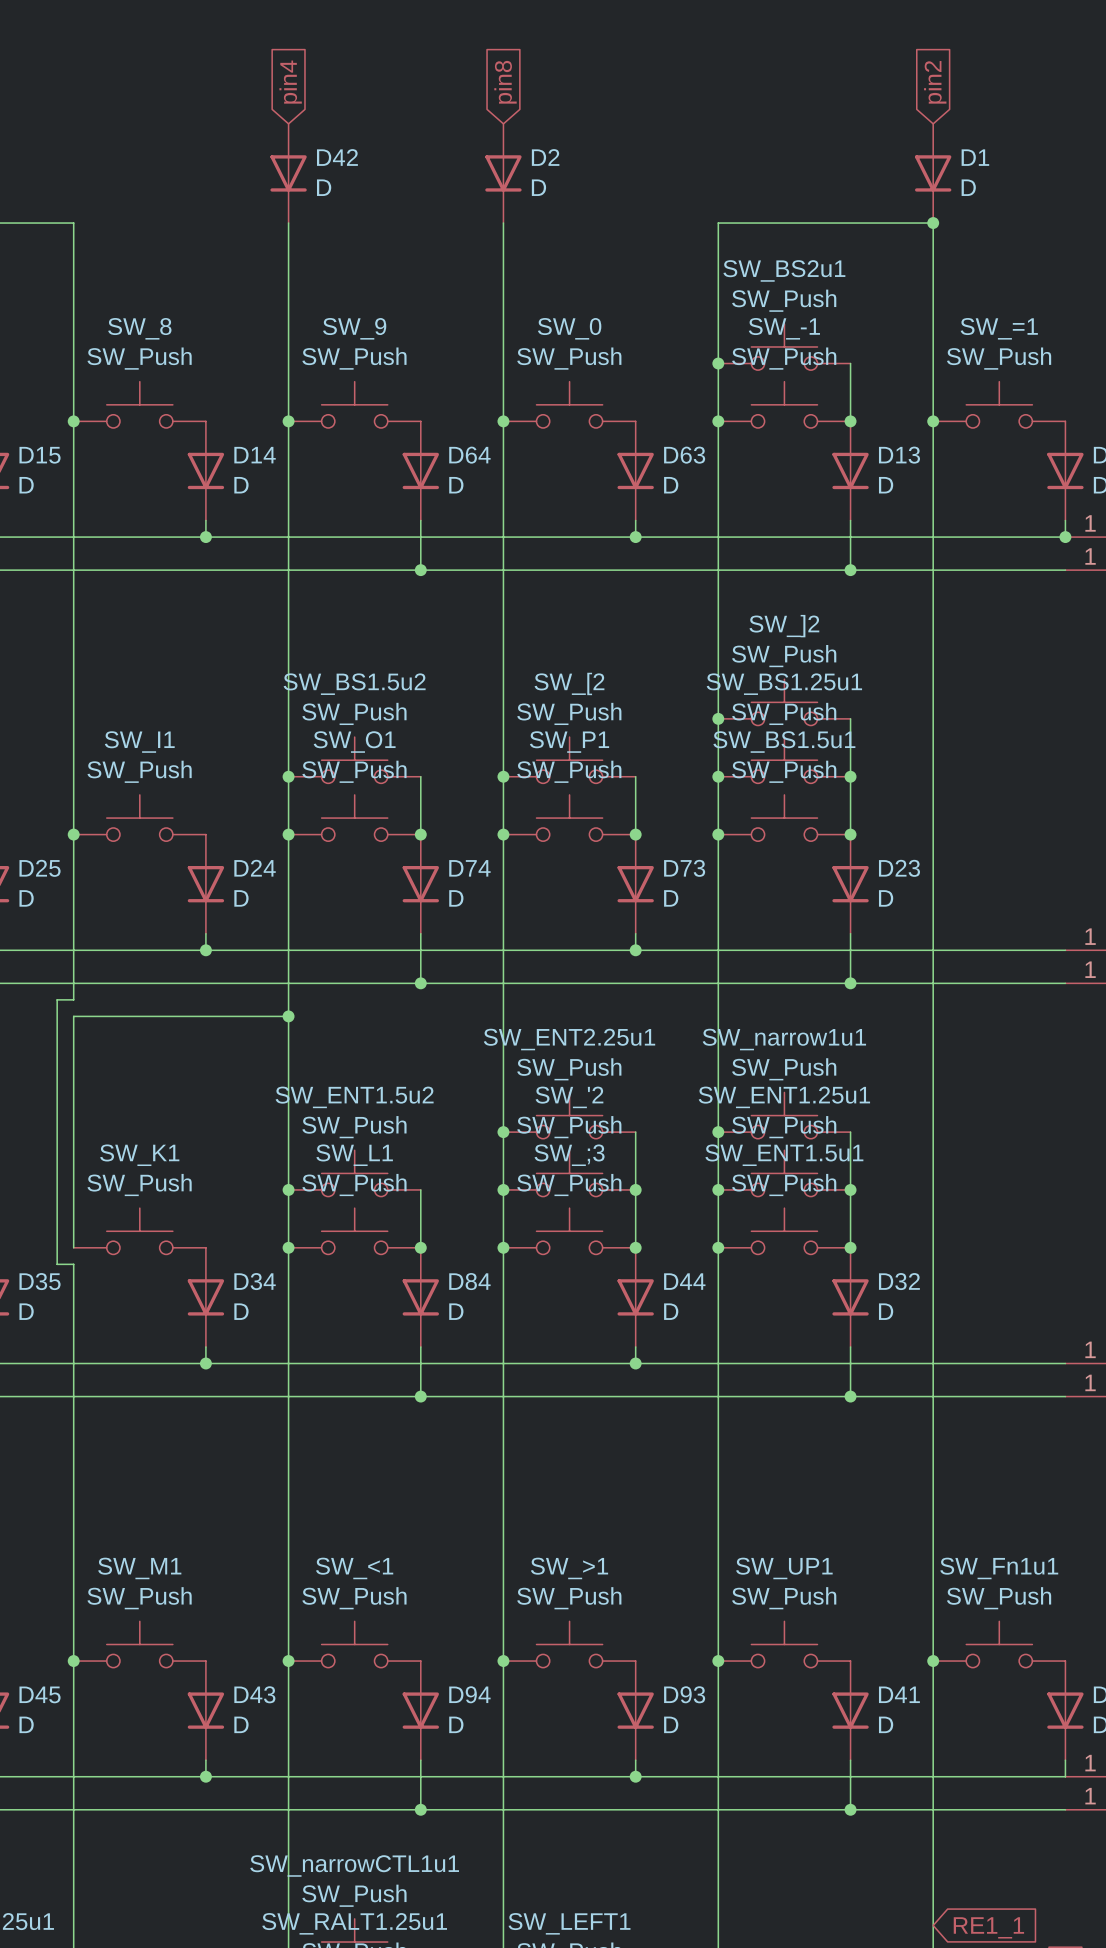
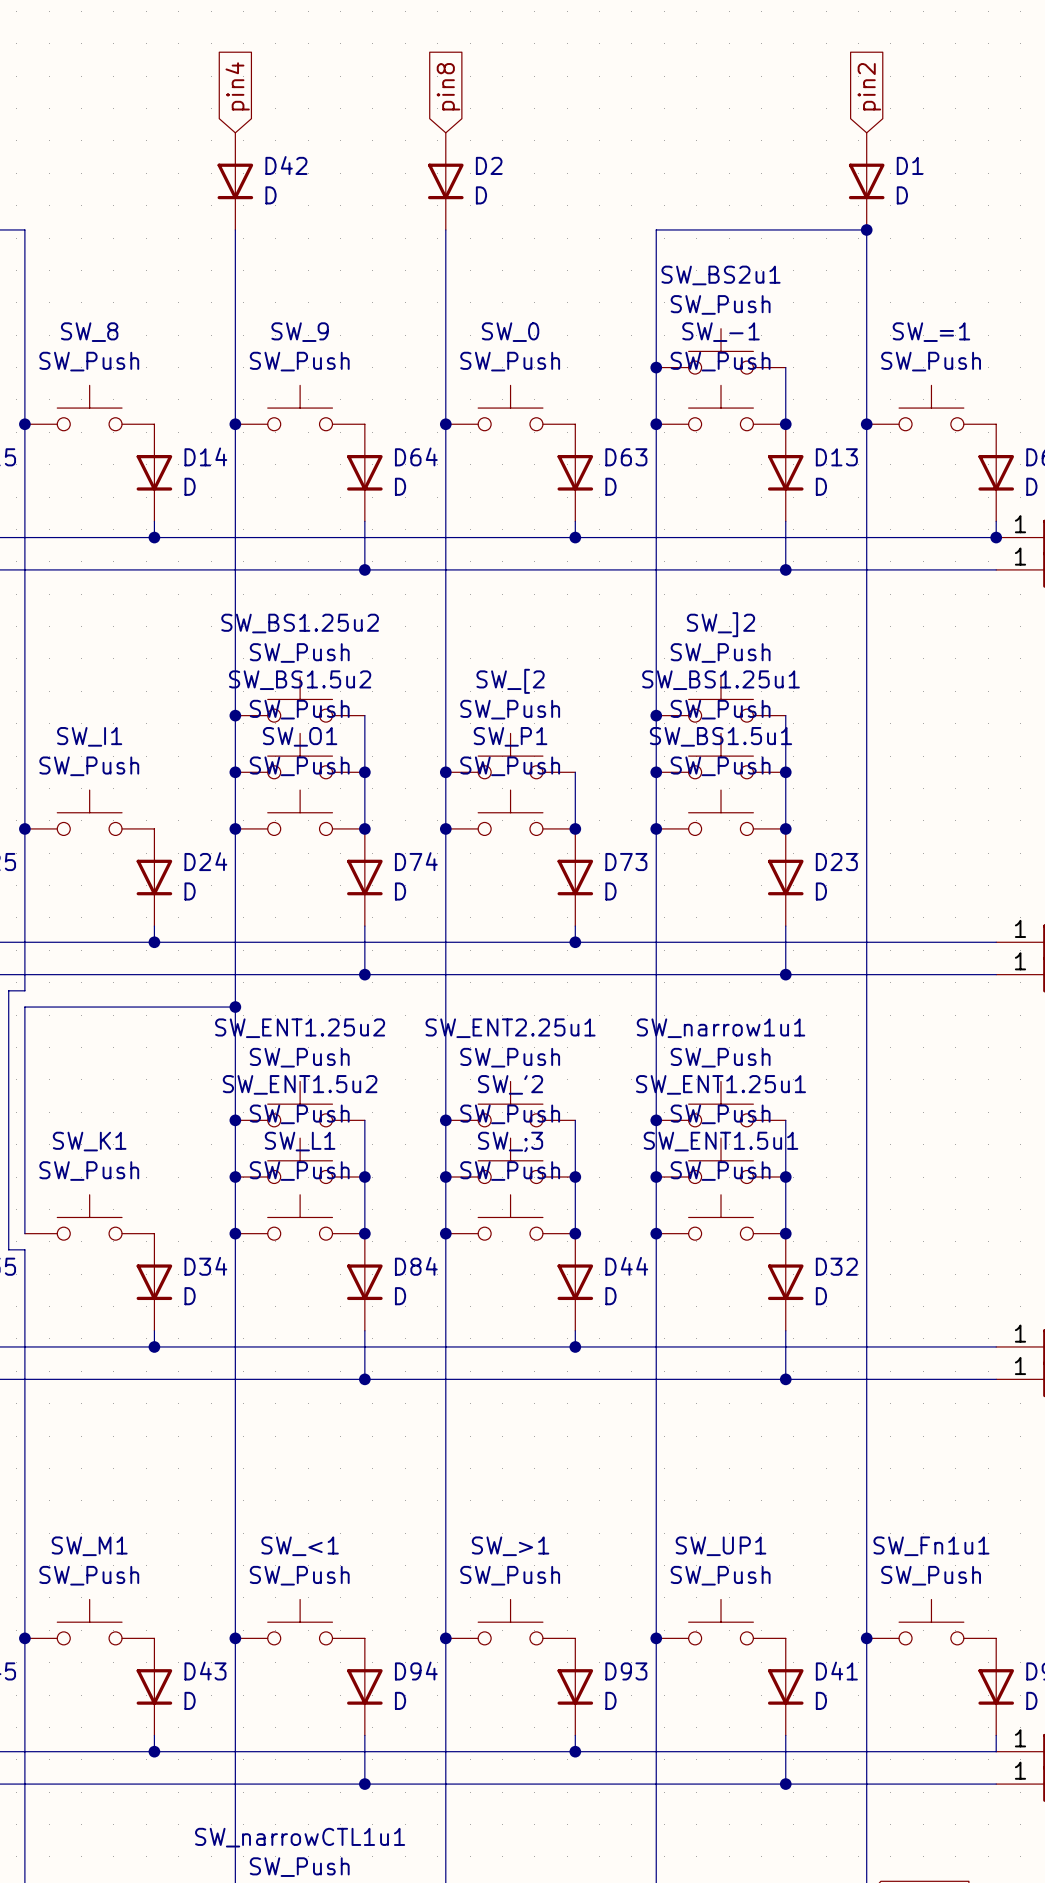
SW_BS1.25u2: none -> SW_Push (300, 699)
junction: none -> (235, 715)
wire: none -> (364, 715) (364, 772)
junction: none -> (364, 772)
SW_ENT1.25u2: none -> SW_Push (300, 1104)
junction: none -> (235, 1120)
wire: none -> (364, 1120) (364, 1177)
junction: none -> (364, 1177)

